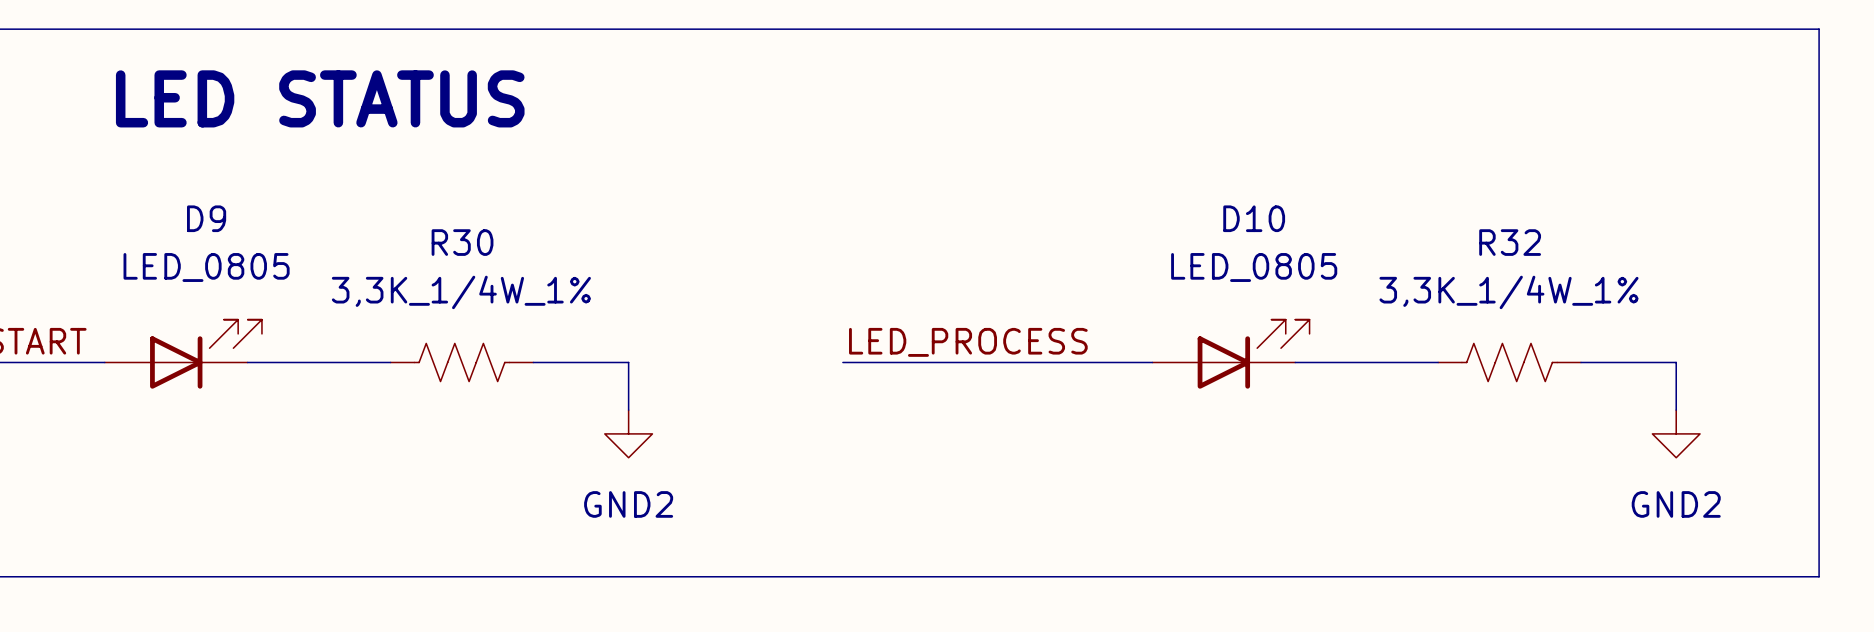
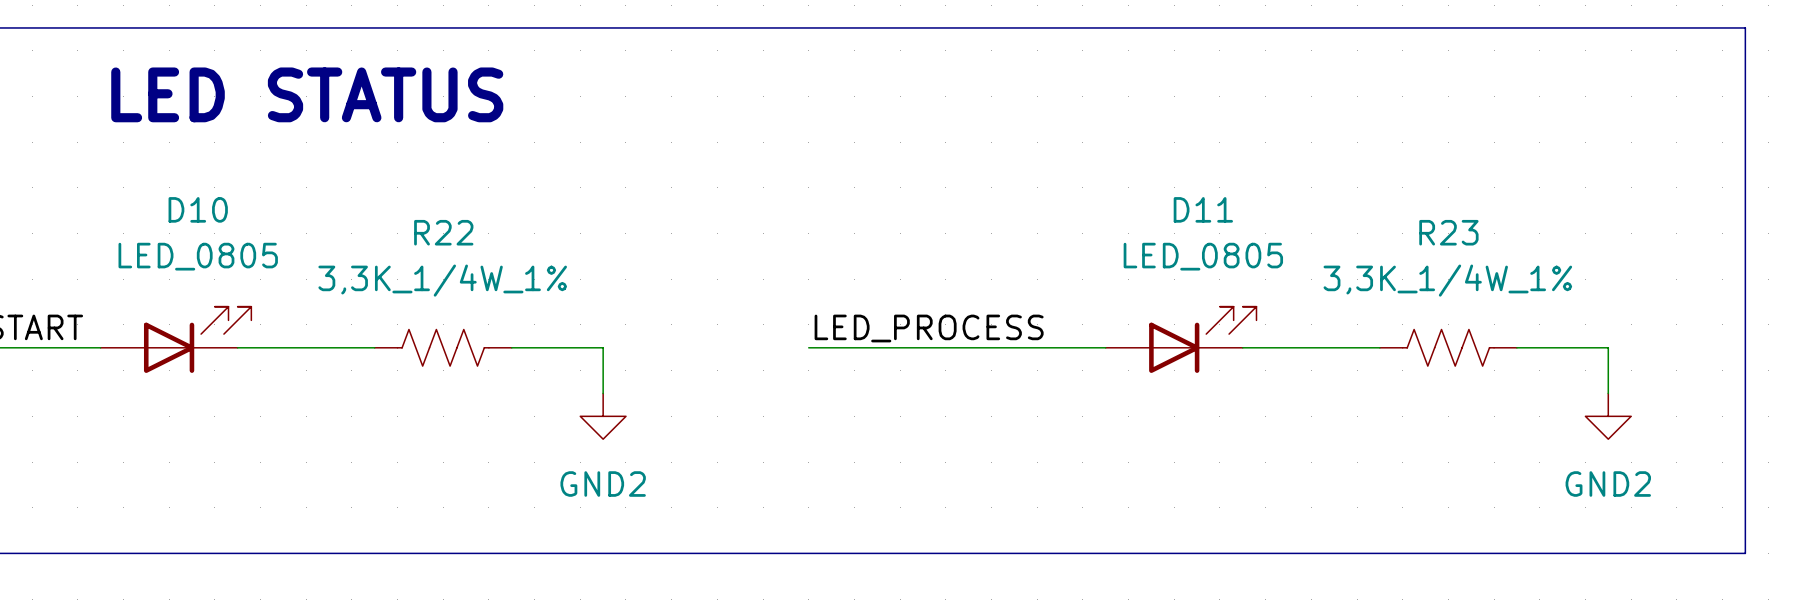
D9 name: D9 (206, 218) -> D10 (198, 209)
D10 name: D10 (1254, 218) -> D11 (1203, 209)
R30 name: R30 (462, 242) -> R22 (443, 232)
R32 name: R32 (1510, 242) -> R23 (1448, 232)

